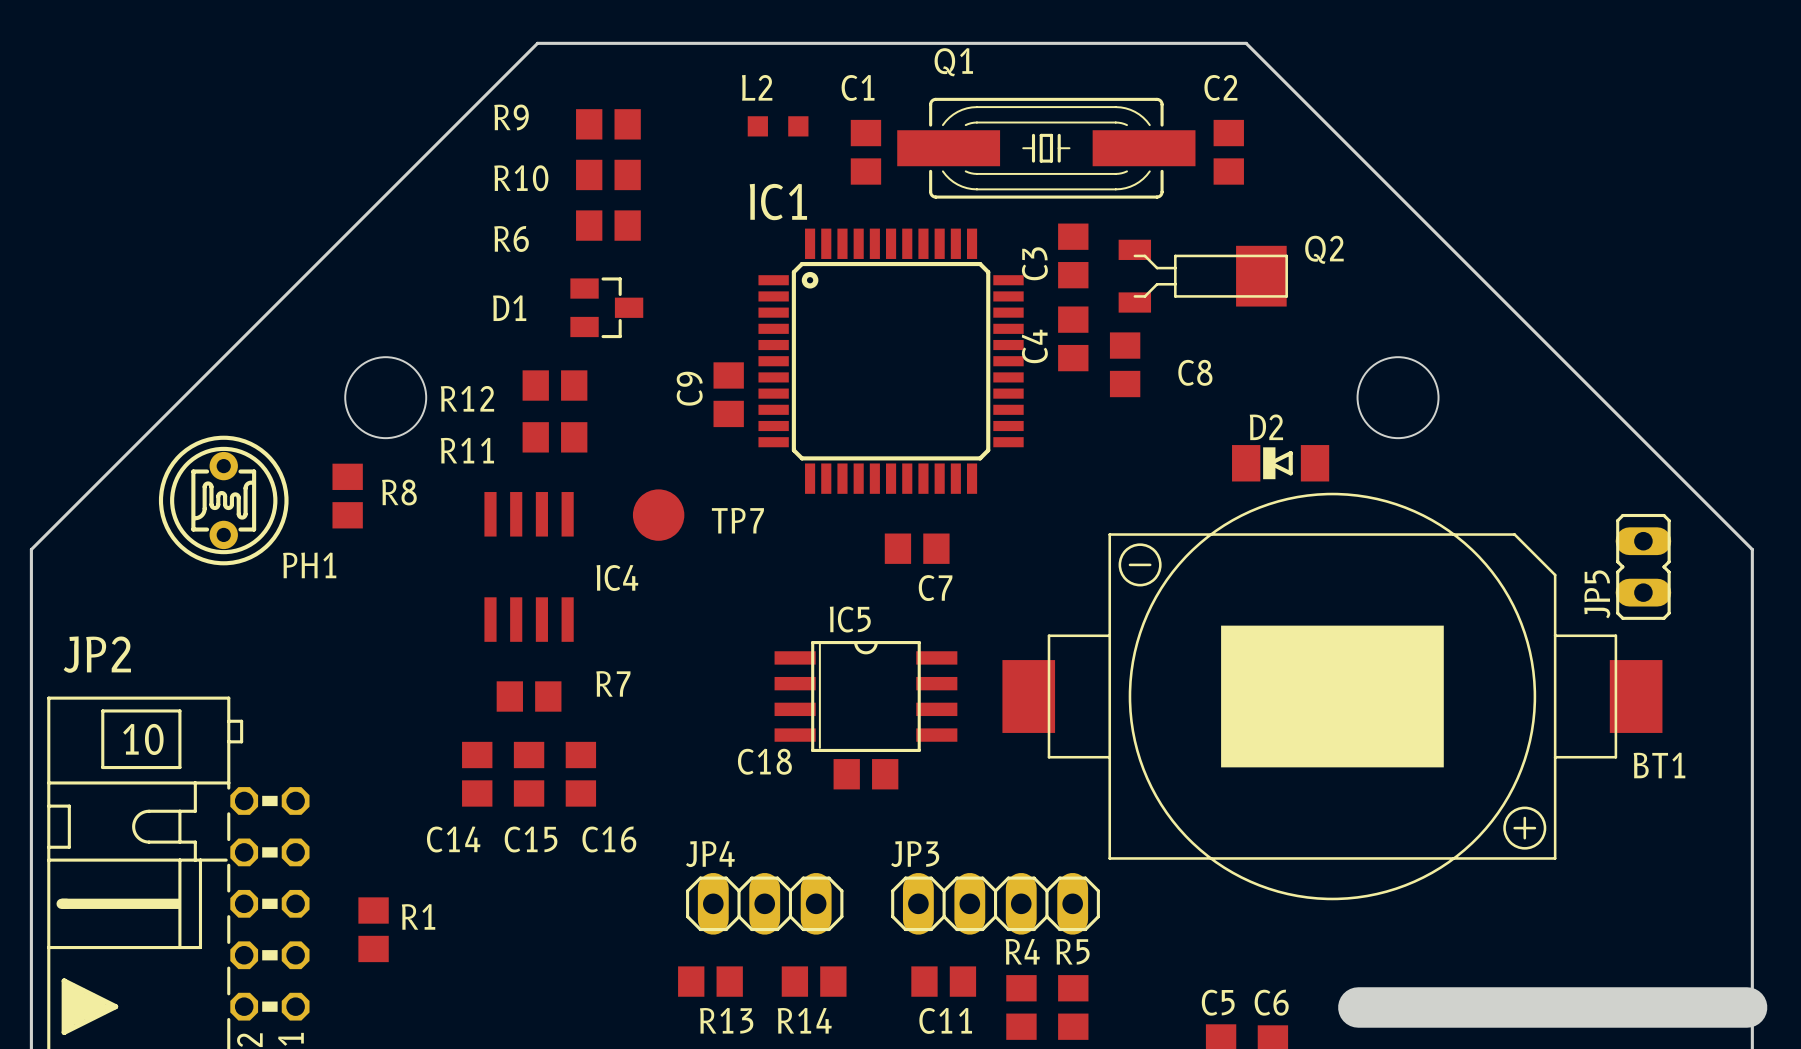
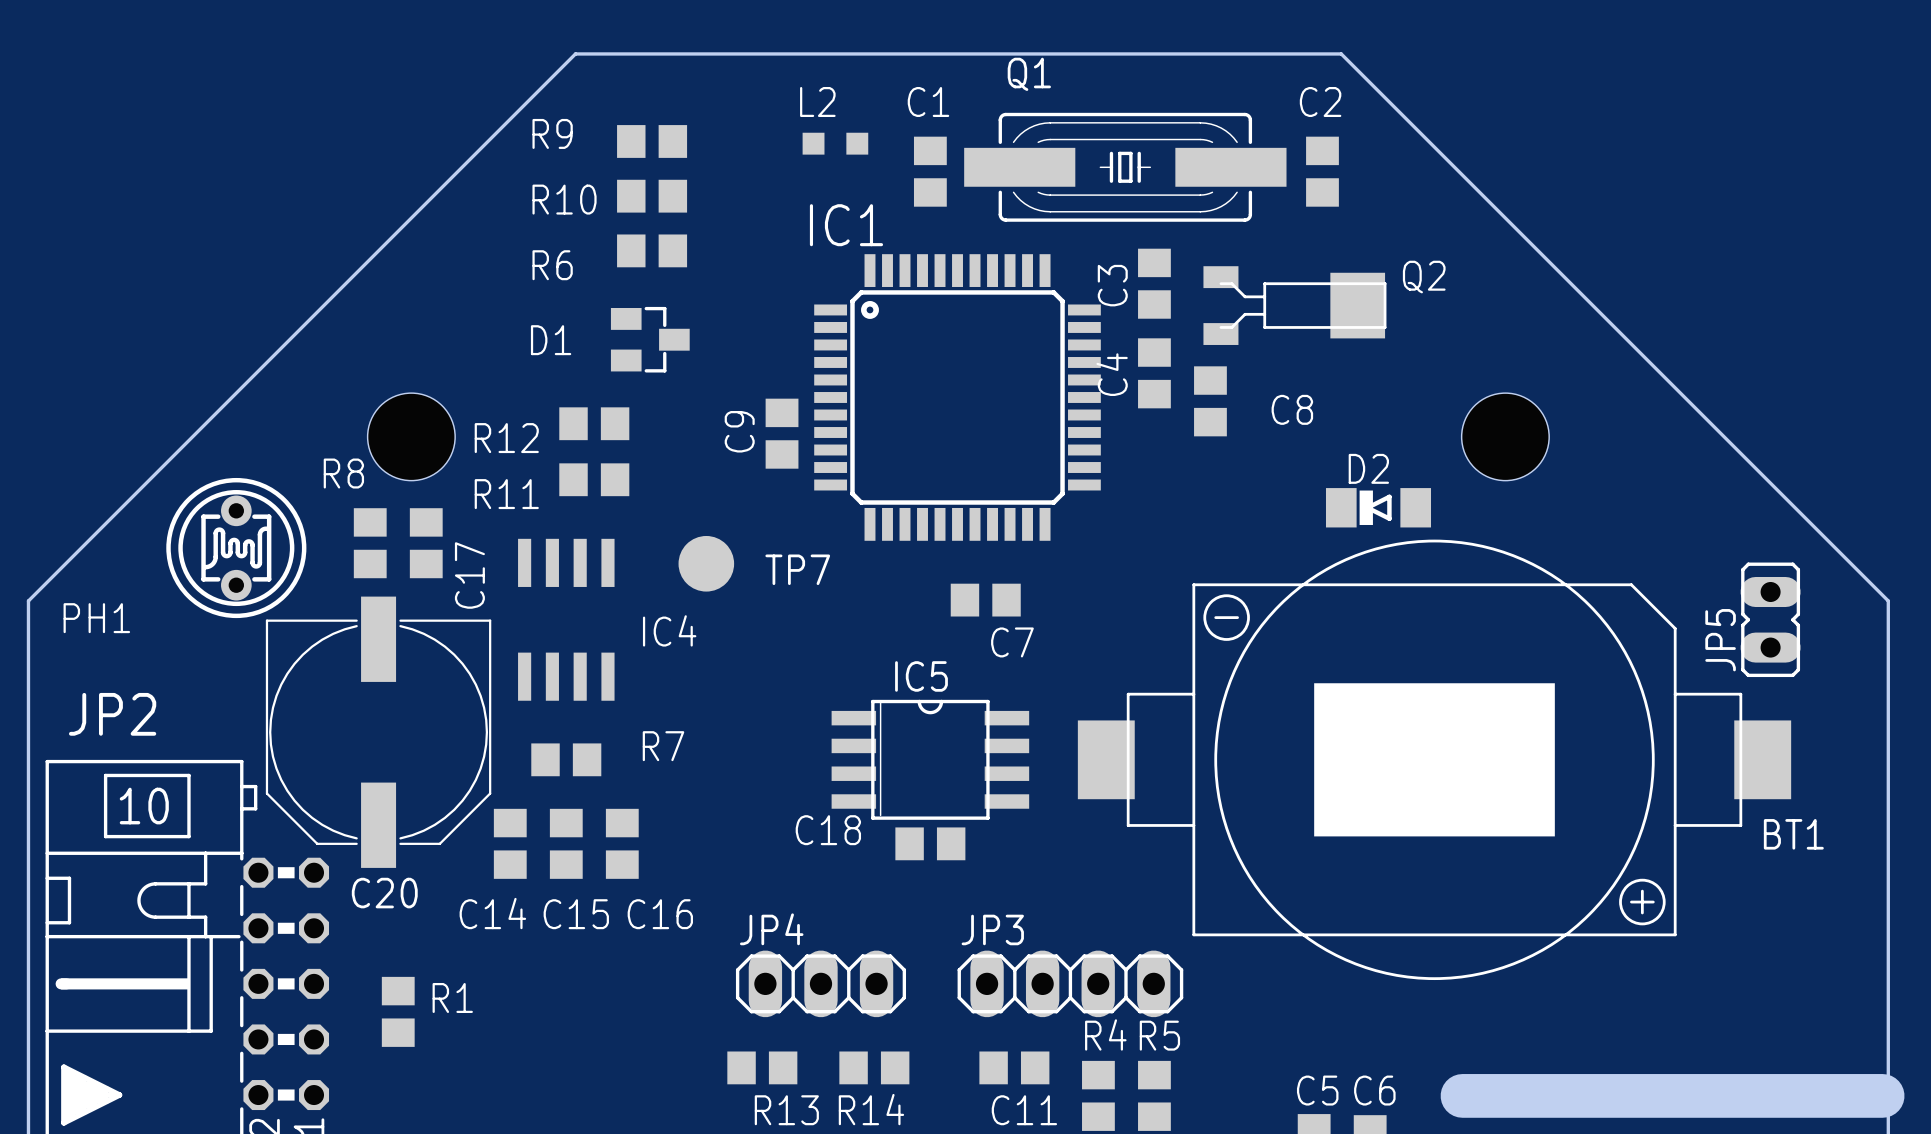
R8 name position: R8 (399, 492) -> R8 (343, 473)
C17: none -> (426, 543)
PH1 name position: PH1 (309, 565) -> PH1 (96, 618)
C20: none -> (378, 732)

